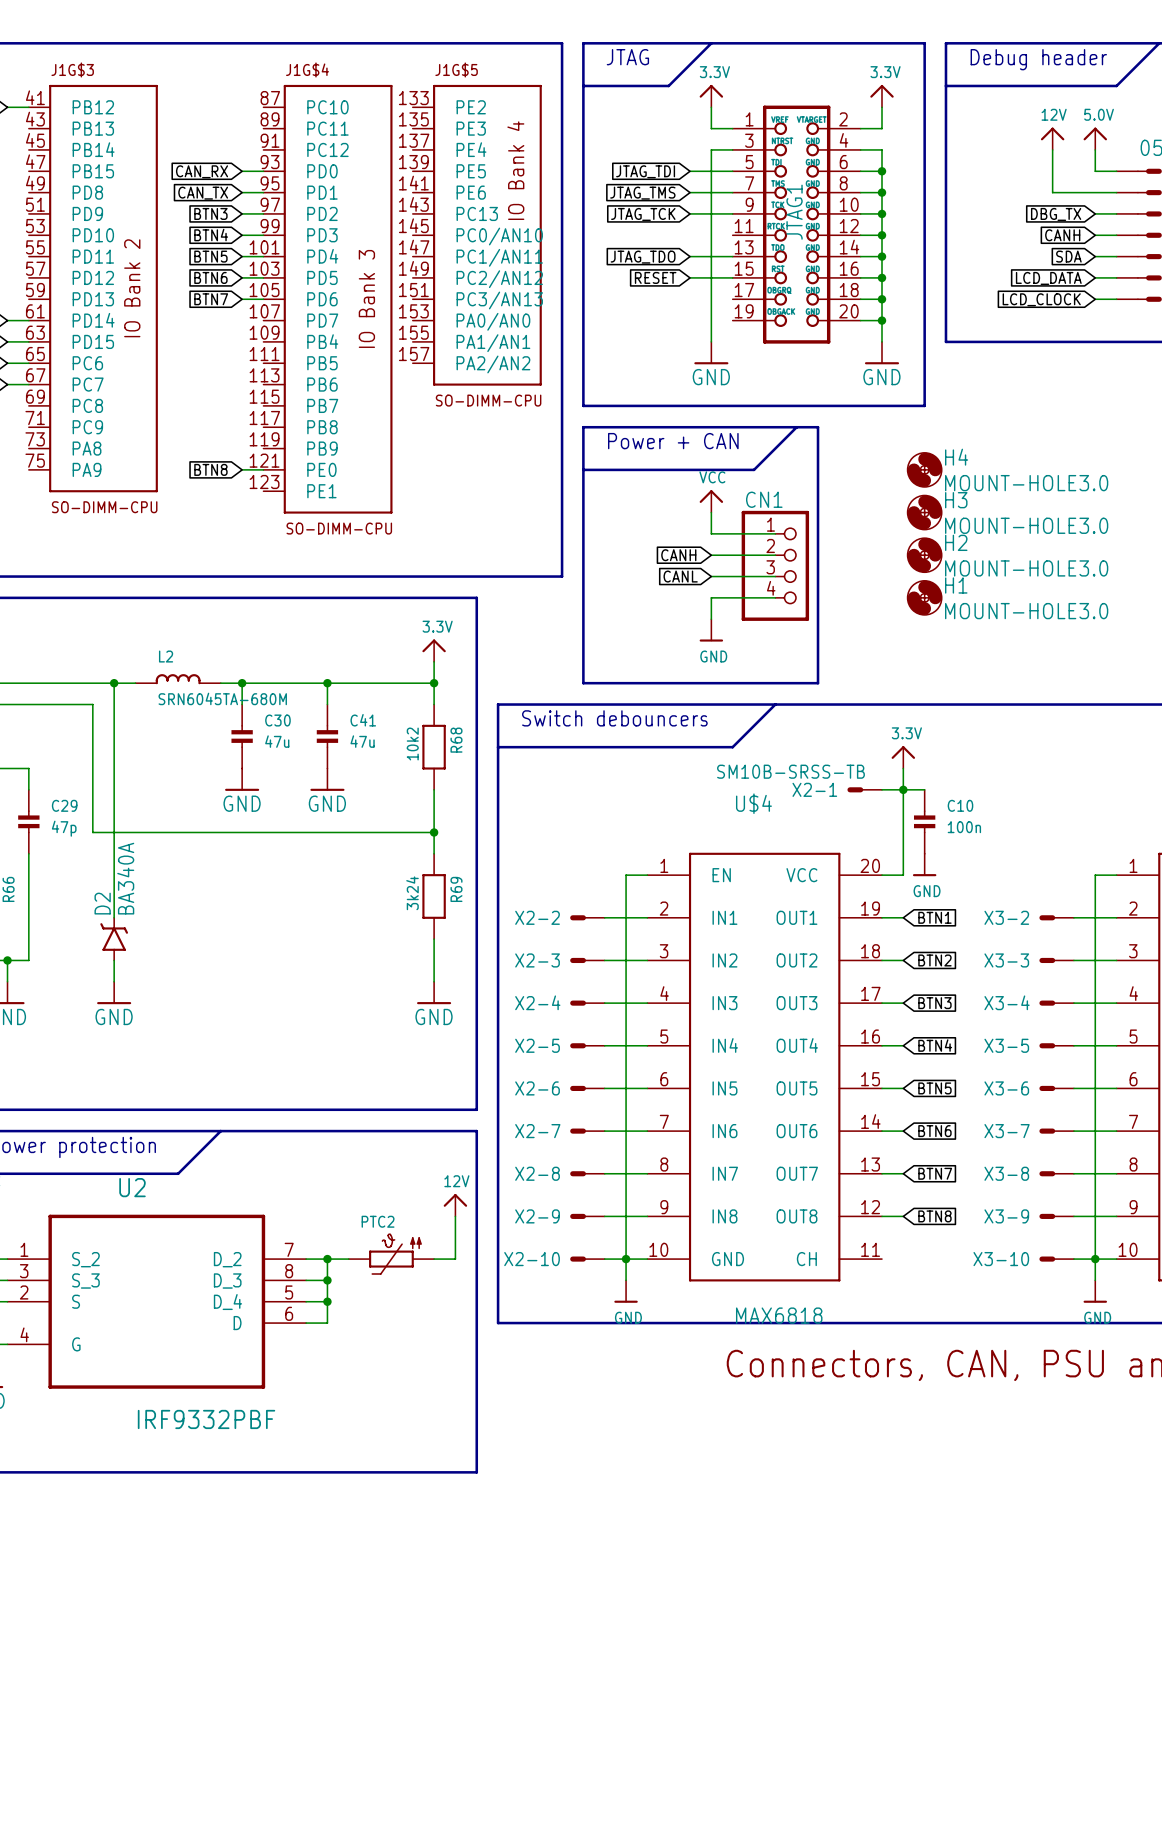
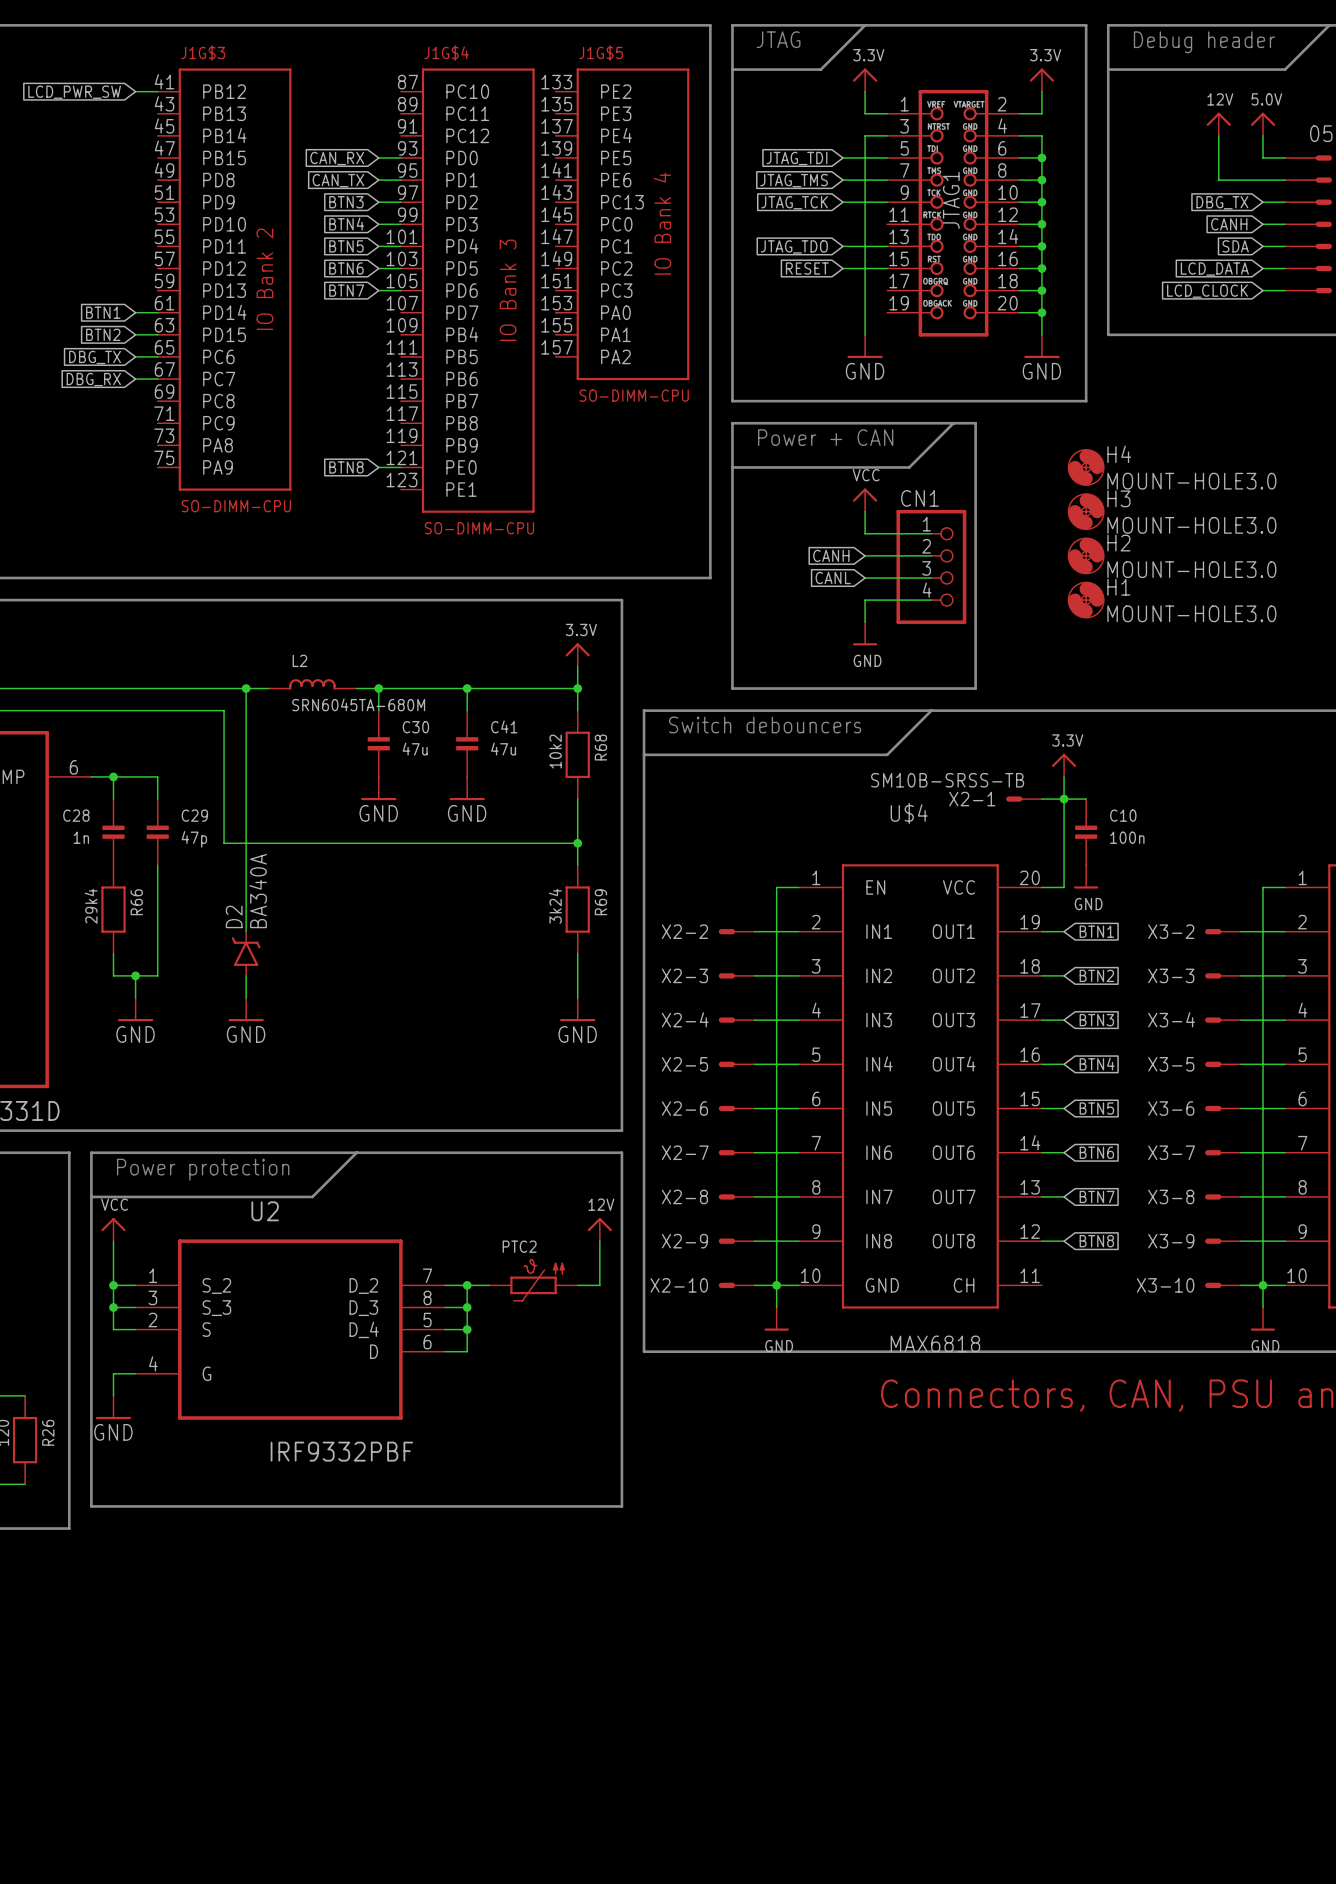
J1G$5 text position: IO Bank 4 (515, 170) -> IO Bank 4 (662, 223)
J1G$5 pin name: PC0/AN10 (499, 236) -> PC0 (616, 224)
J1G$5 pin name: PC1/AN11 (499, 257) -> PC1 (616, 246)
J1G$5 pin name: PC2/AN12 (499, 279) -> PC2 (616, 268)
J1G$5 pin name: PC3/AN13 (499, 300) -> PC3 (616, 290)
J1G$5 pin name: PA0/AN0 (493, 321) -> PA0 (615, 312)
J1G$5 pin name: PA1/AN1 (493, 343) -> PA1 (615, 334)
J1G$5 pin name: PA2/AN2 (493, 364) -> PA2 (615, 356)

